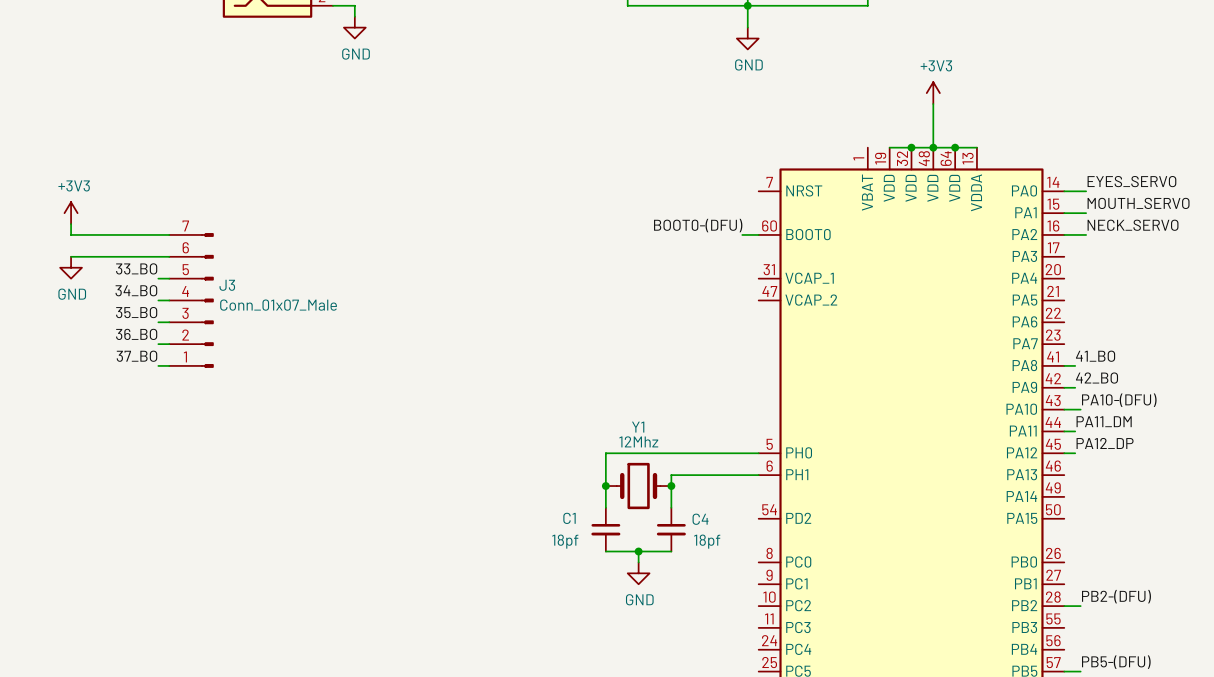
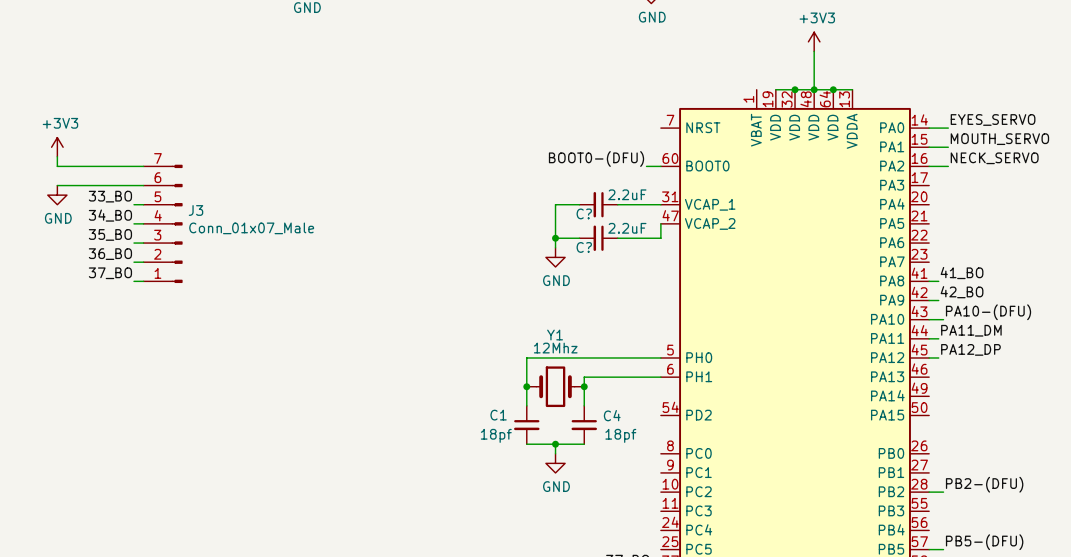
wire: none -> (579, 204) (555, 204) (555, 247)
C?: none -> 2.2uF (598, 204)
wire: none -> (617, 204) (660, 204)
wire: none -> (660, 223) (660, 238) (617, 238)
wire: none -> (555, 238) (579, 238)
junction: none -> (555, 238)
C?: none -> 2.2uF (598, 238)
power symbol: none -> GND (555, 257)

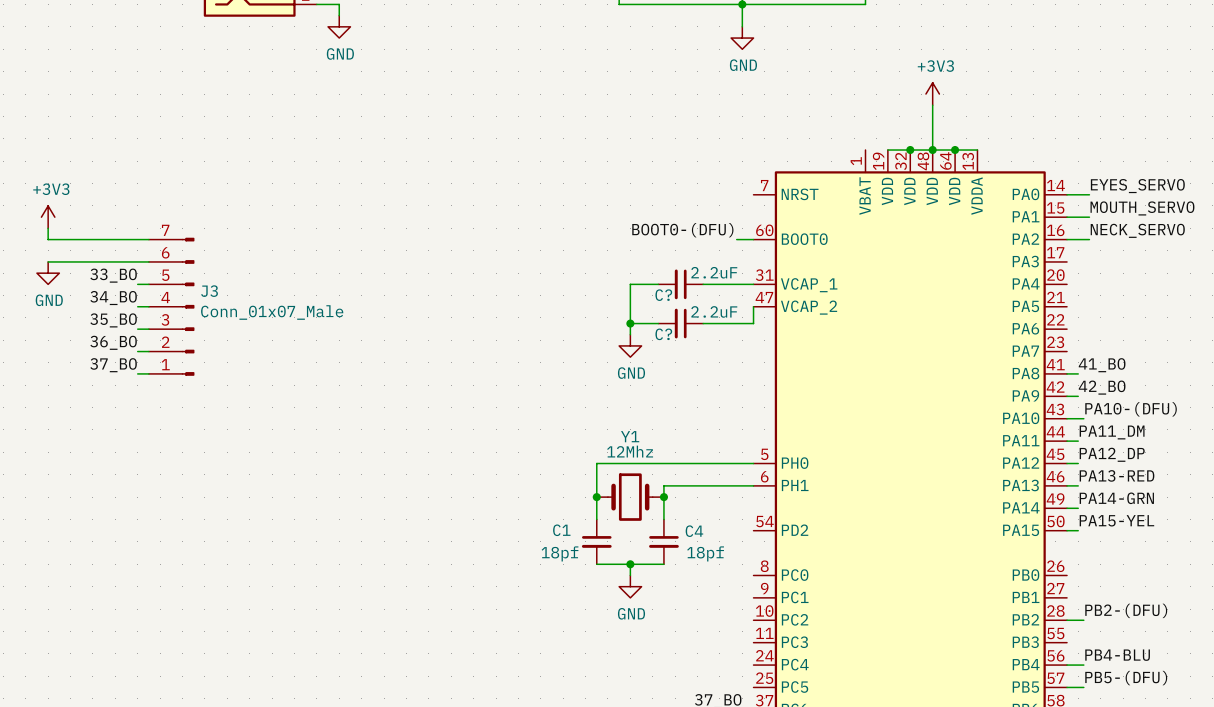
label: none -> PA13-RED (1117, 475)
wire: none -> (1067, 485) (1078, 485)
label: none -> PA14-GRN (1116, 498)
wire: none -> (1067, 508) (1078, 508)
label: none -> PA15-YEL (1116, 520)
wire: none -> (1067, 530) (1078, 530)
label: none -> PB4-BLU (1117, 655)
wire: none -> (1067, 665) (1083, 665)

